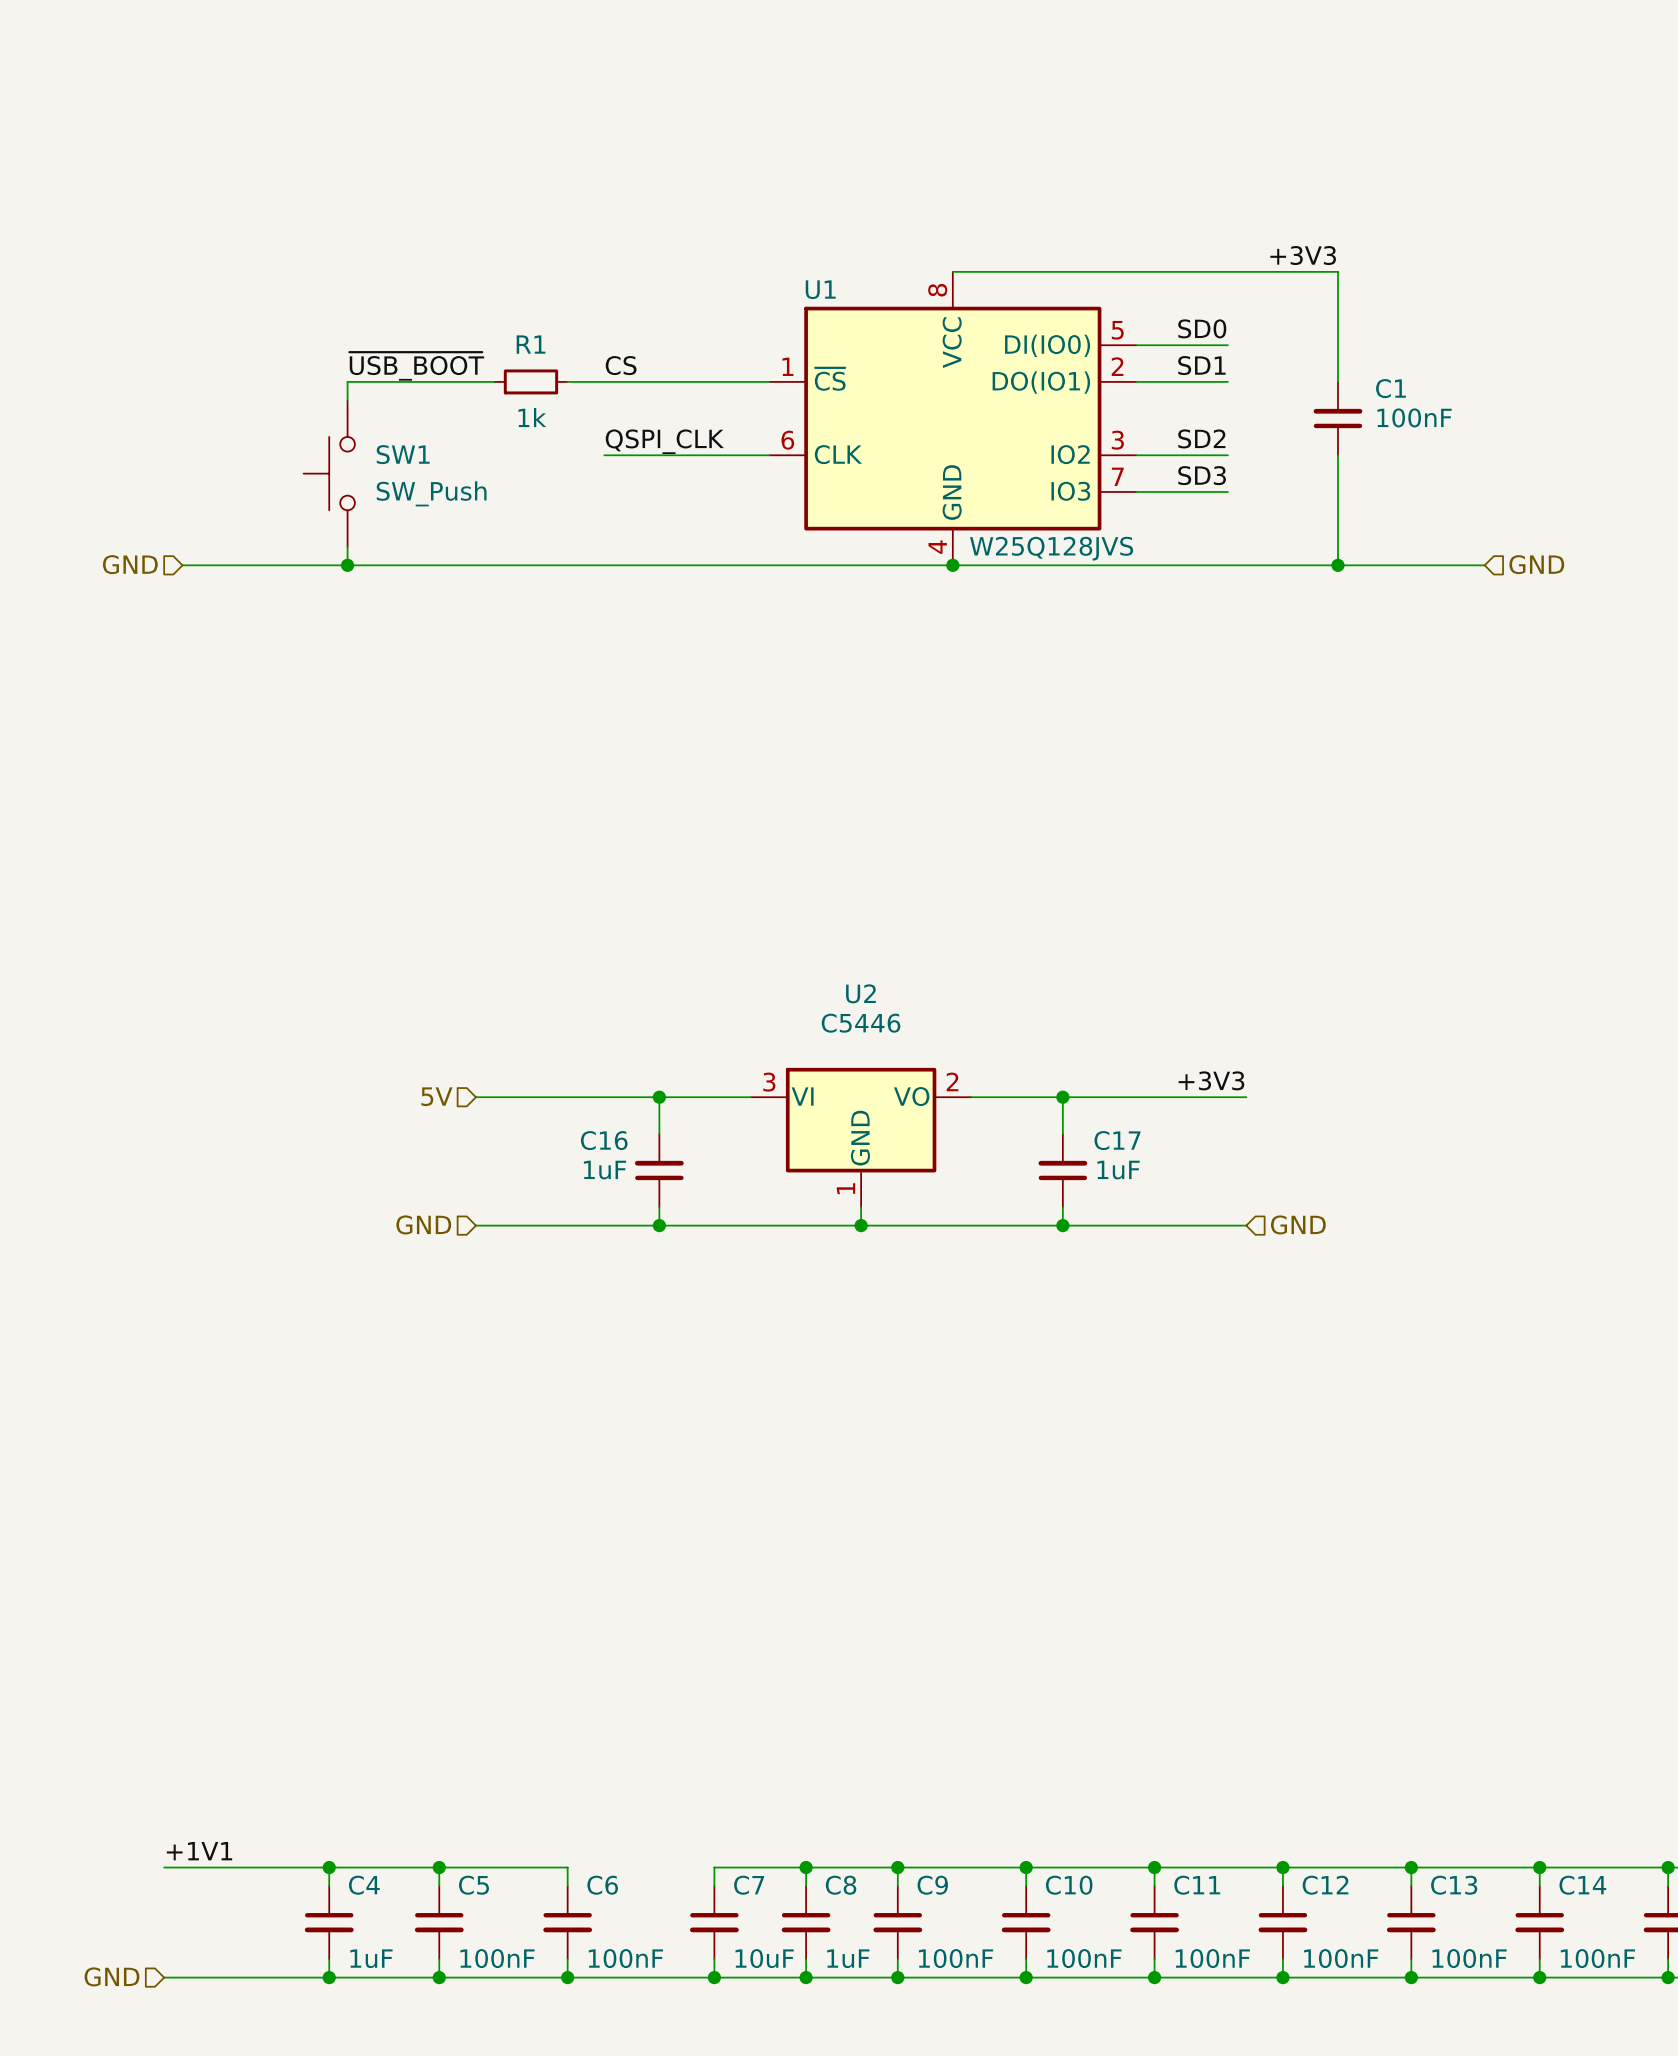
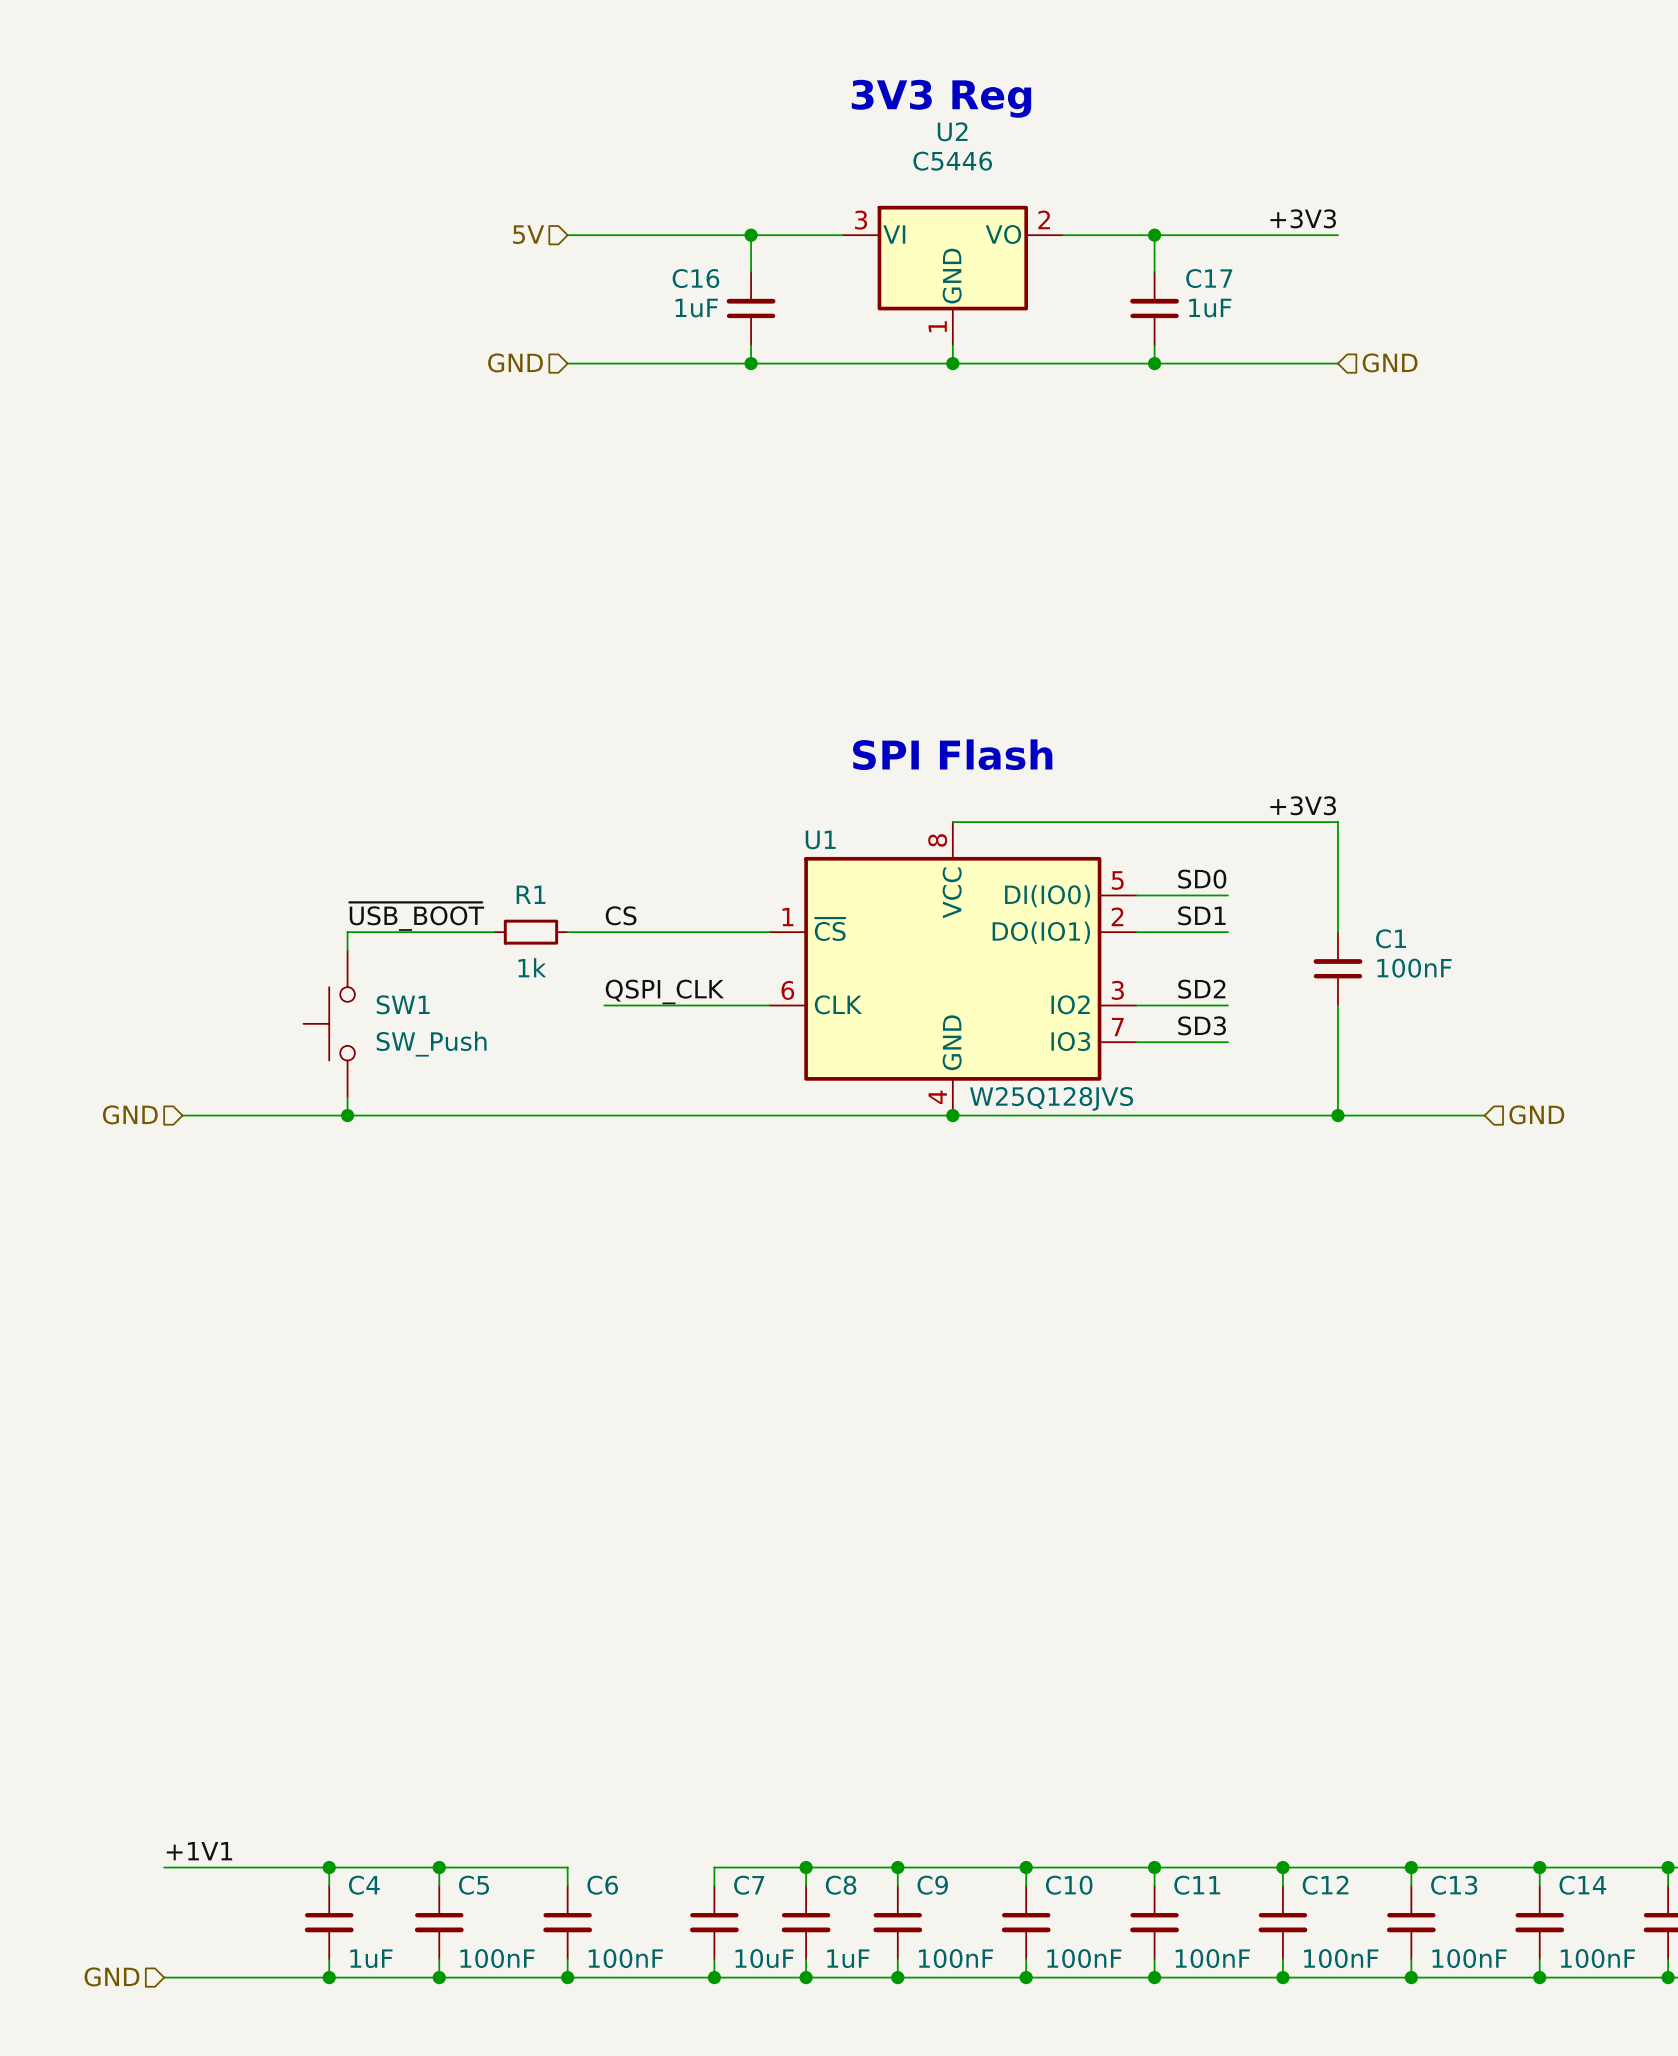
text: none -> 3V3 Reg (941, 98)
hierarchical label: none -> 5V (528, 234)
wire: none -> (567, 235) (842, 235)
wire: none -> (751, 235) (751, 271)
junction: none -> (751, 235)
wire: none -> (1062, 235) (1337, 235)
wire: none -> (1154, 235) (1154, 271)
junction: none -> (1154, 235)
label position: +3V3 (1303, 255) -> +3V3 (1303, 218)
wire: (952, 271) (1337, 271) (1337, 381) -> none
label: SD0 (1202, 328) -> none
wire: none -> (751, 345) (751, 363)
wire: (1136, 345) (1227, 345) -> none
wire: none -> (1154, 345) (1154, 363)
hierarchical label: none -> GND (515, 362)
wire: none -> (567, 363) (1337, 363)
junction: none -> (751, 363)
junction: none -> (952, 363)
junction: none -> (1154, 363)
label: CS (621, 365) -> none
label: SD1 (1201, 365) -> none
label: ~{USB_BOOT} (416, 366) -> none
wire: (494, 381) (347, 381) (347, 400) -> none
R1 position: (530, 381) -> (530, 932)
wire: (567, 381) (769, 381) -> none
wire: (1136, 381) (1227, 381) -> none
U1 position: (952, 418) -> (952, 968)
C1 position: (1337, 418) -> (1337, 968)
label: SD2 (1201, 438) -> none
label: QSPI_CLK (664, 441) -> none
wire: (604, 455) (769, 455) -> none
wire: (1136, 455) (1227, 455) -> none
wire: (1337, 455) (1337, 565) -> none
SW1 position: (329, 473) -> (329, 1023)
label: SD3 (1202, 475) -> none
wire: (1136, 491) (1227, 491) -> none
wire: (347, 546) (347, 565) -> none
hierarchical label: GND (130, 564) -> none
hierarchical label position: GND (1536, 564) -> GND (1390, 362)
wire: (182, 565) (1484, 565) -> none
junction: (347, 565) -> none
junction: (952, 565) -> none
junction: (1337, 565) -> none
text: none -> SPI Flash (952, 754)
label: none -> +3V3 (1303, 805)
wire: none -> (952, 822) (1337, 822) (1337, 932)
label: none -> SD0 (1202, 879)
wire: none -> (1136, 895) (1227, 895)
label: none -> CS (621, 915)
label: none -> SD1 (1201, 915)
label: none -> ~{USB_BOOT} (416, 916)
wire: none -> (494, 932) (347, 932) (347, 950)
wire: none -> (567, 932) (769, 932)
wire: none -> (1136, 932) (1227, 932)
label: none -> SD2 (1201, 989)
label: none -> QSPI_CLK (664, 991)
wire: none -> (604, 1005) (769, 1005)
wire: none -> (1136, 1005) (1227, 1005)
wire: none -> (1337, 1005) (1337, 1115)
label: none -> SD3 (1202, 1025)
wire: none -> (1136, 1042) (1227, 1042)
label: +3V3 (1211, 1080) -> none
hierarchical label: 5V (436, 1096) -> none
wire: (475, 1097) (751, 1097) -> none
wire: (659, 1097) (659, 1133) -> none
junction: (659, 1097) -> none
wire: (971, 1097) (1246, 1097) -> none
wire: (1062, 1097) (1062, 1133) -> none
junction: (1062, 1097) -> none
hierarchical label: none -> GND (130, 1114)
wire: none -> (182, 1115) (1484, 1115)
junction: none -> (347, 1115)
junction: none -> (952, 1115)
junction: none -> (1337, 1115)
U2 position: (861, 1137) -> (952, 275)
C16 position: (659, 1170) -> (751, 308)
C17 position: (1062, 1170) -> (1154, 308)
wire: (659, 1207) (659, 1225) -> (347, 1097) (347, 1115)
wire: (861, 1207) (861, 1225) -> none
wire: (1062, 1207) (1062, 1225) -> none
hierarchical label: GND (423, 1224) -> none
hierarchical label position: GND (1298, 1224) -> GND (1536, 1114)
wire: (475, 1225) (1246, 1225) -> none
junction: (659, 1225) -> none
junction: (861, 1225) -> none
junction: (1062, 1225) -> none

